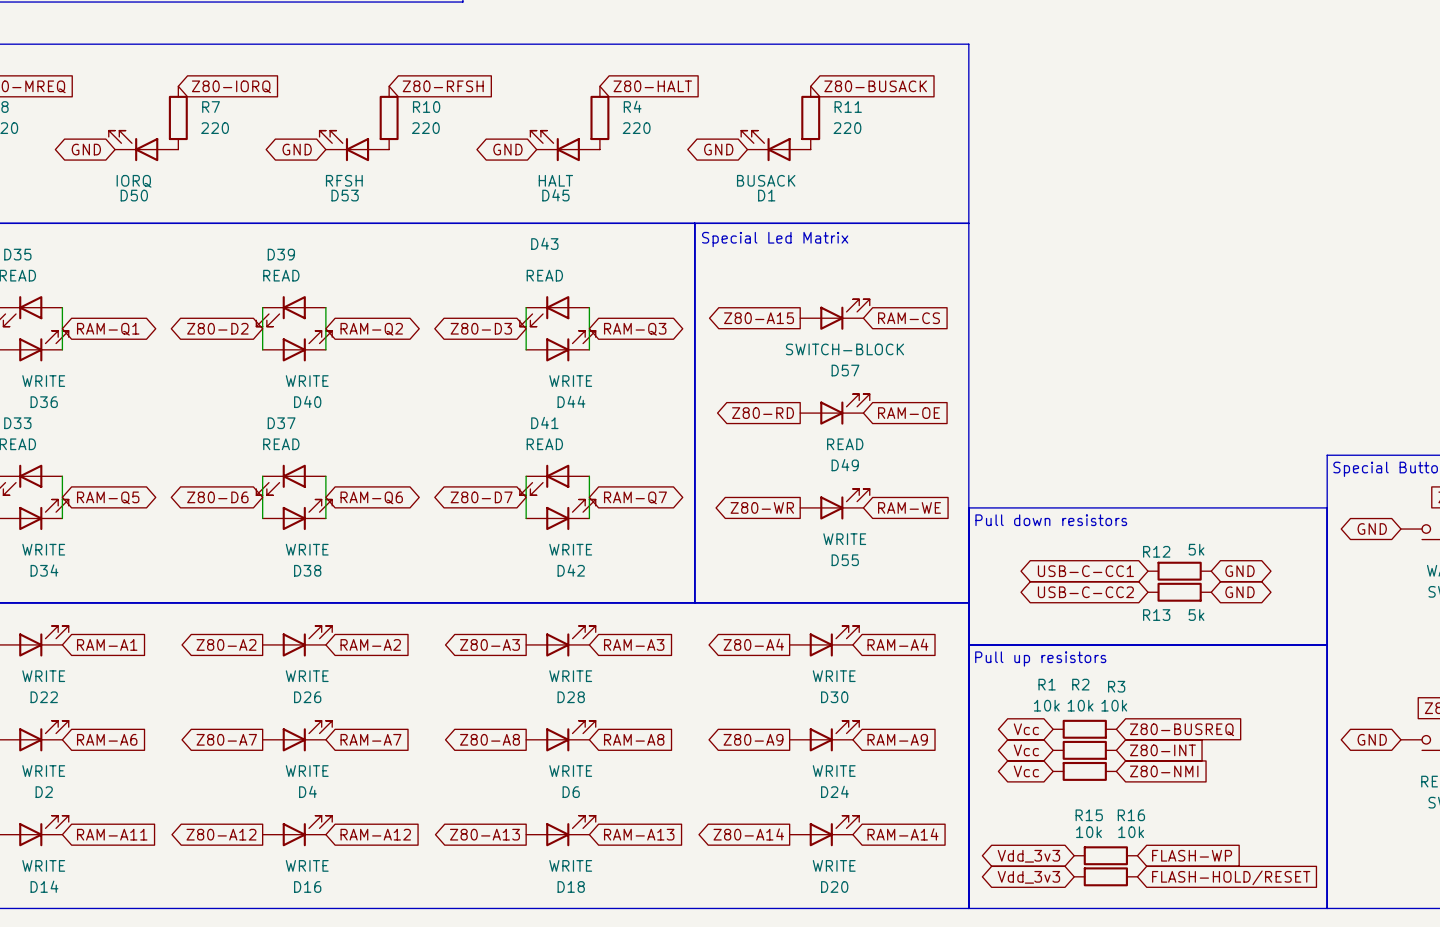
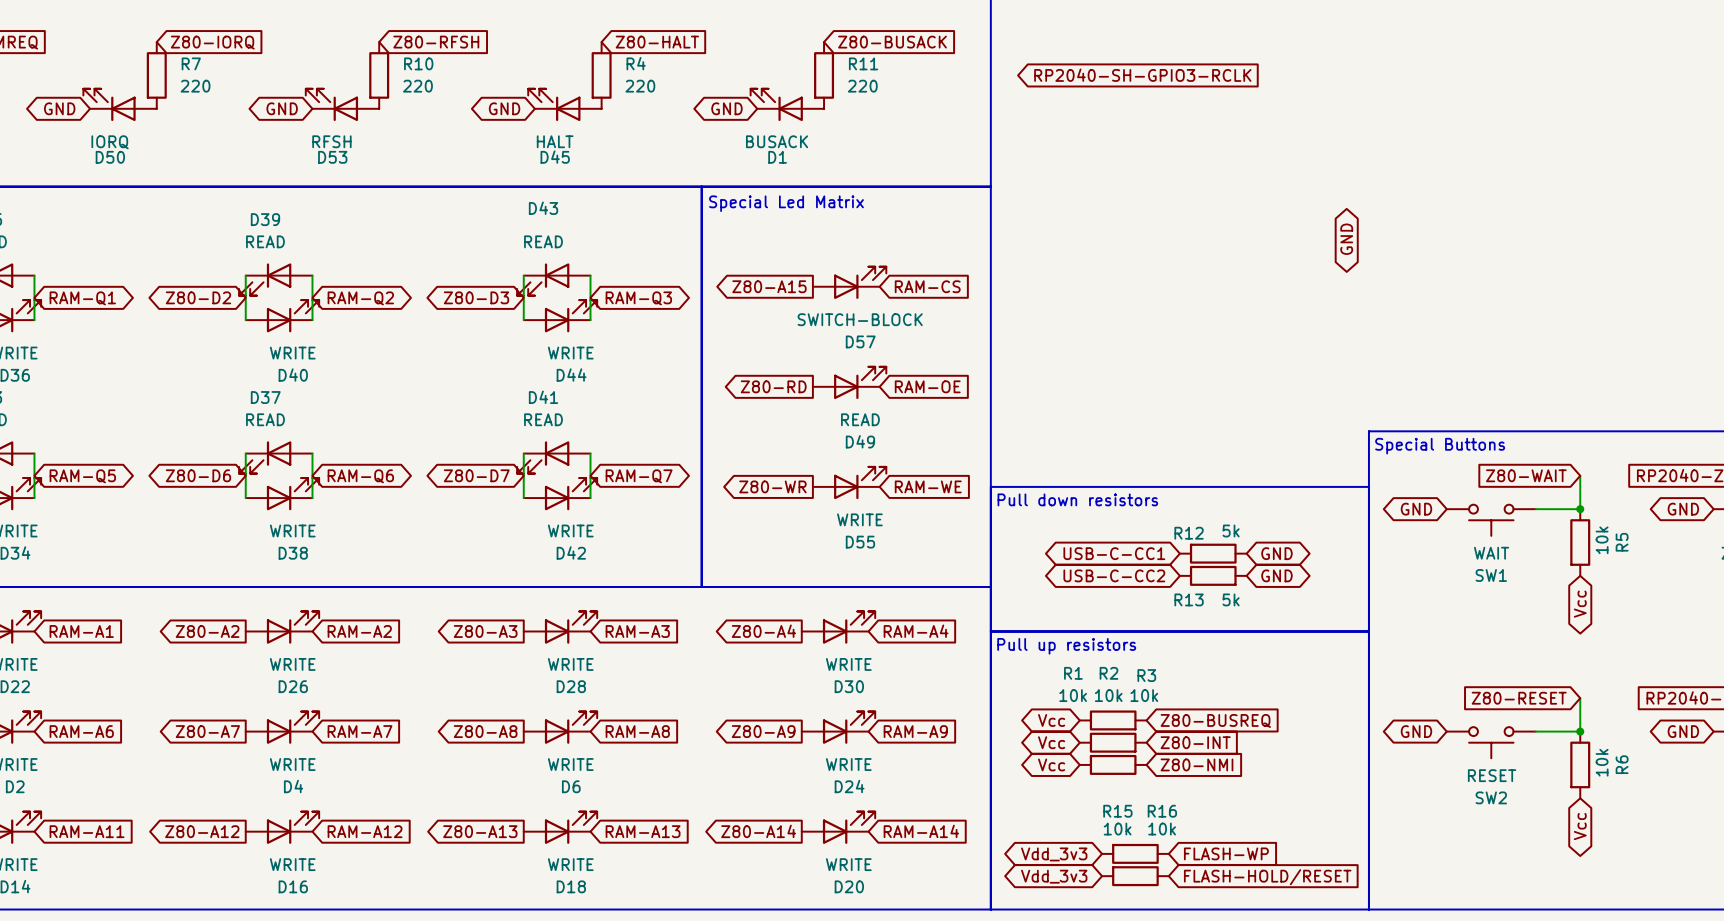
global label: none -> RP2040-SH-GPIO3-RCLK (1142, 75)
global label: none -> GND (1346, 239)

